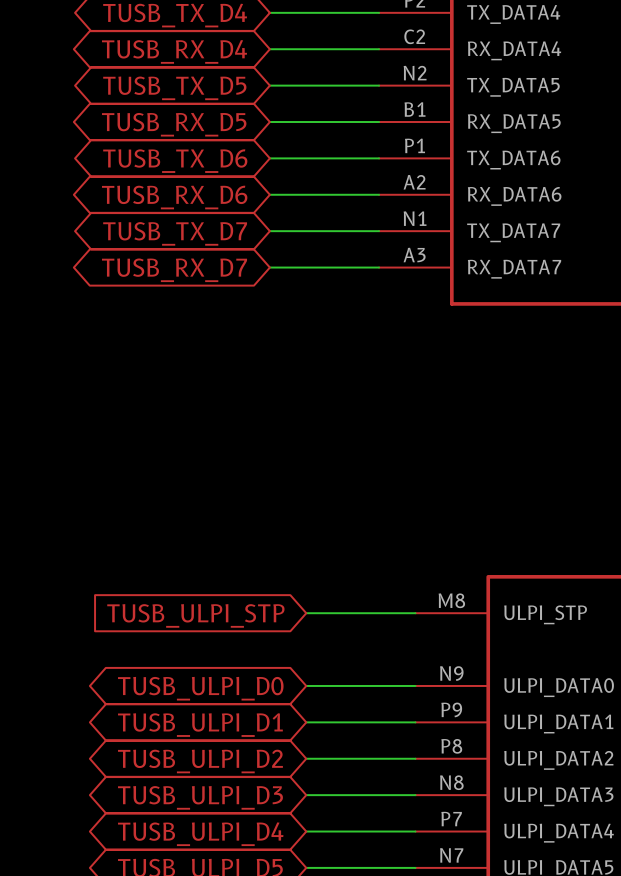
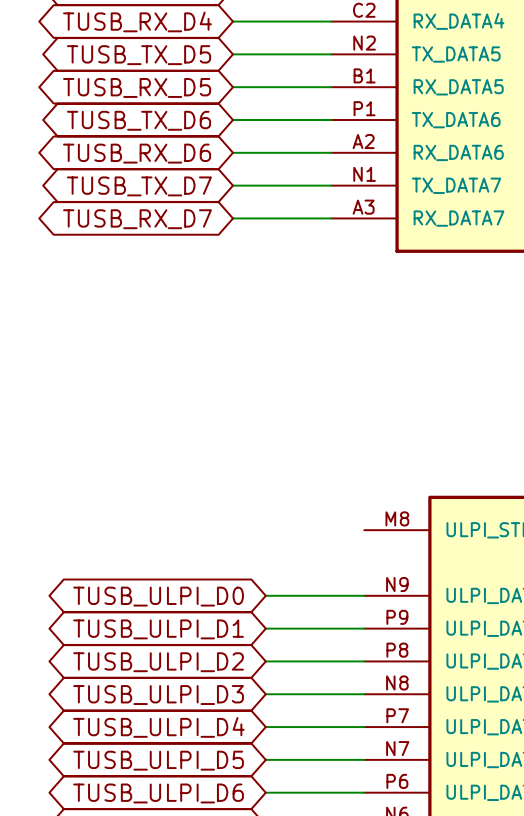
wire: (306, 613) (415, 613) -> none
global label: TUSB_ULPI_STP (195, 615) -> none

